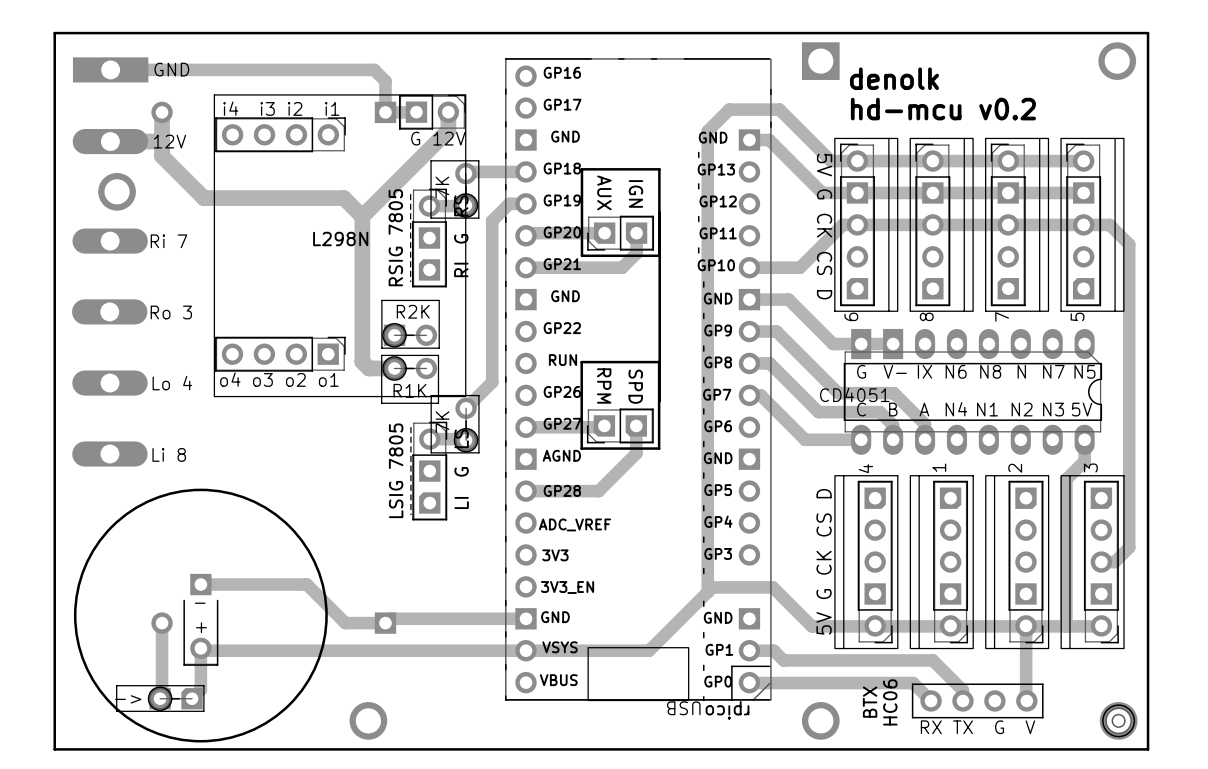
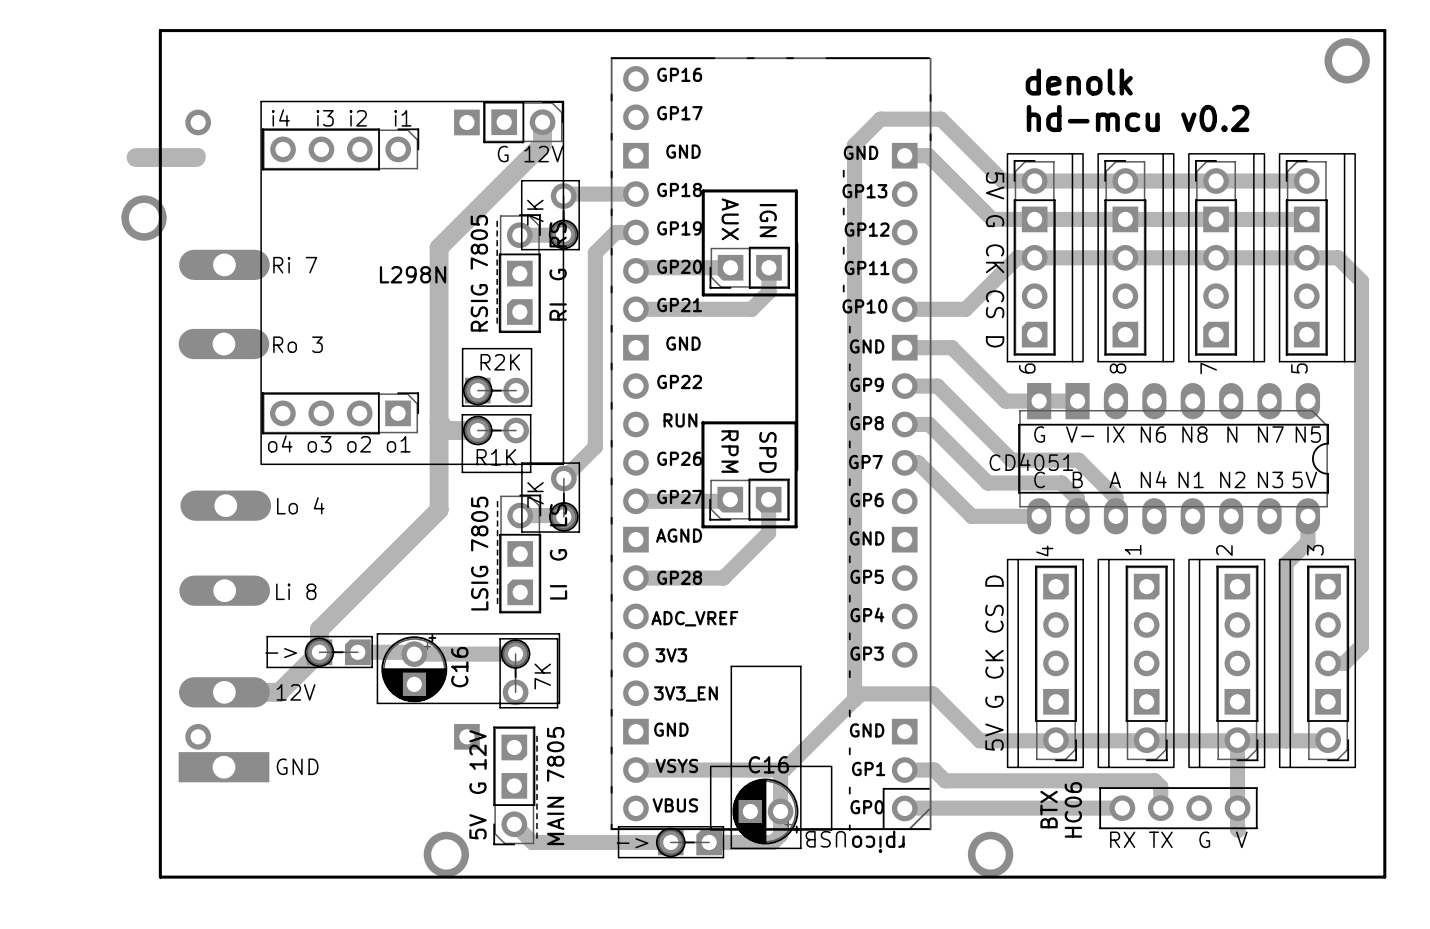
board edge: (54, 33) (1148, 33) (1148, 749) (54, 749) (54, 33) -> (160, 30) (160, 877) (1384, 877) (1384, 30) (160, 30)
part: (820, 61) -> none
track: (110, 69) (374, 69) (385, 81) (385, 112) (416, 112) (414, 112) -> none
part: (110, 69) -> none
text: GND (171, 69) -> none
track: (162, 112) (162, 156) (203, 198) (343, 198) (362, 216) -> none
part: (110, 141) -> none
text: 12V (169, 141) -> none
part: none -> (224, 264)
part: (110, 241) -> none
text position: Ri 7 (168, 241) -> Ri 7 (295, 265)
part: none -> (223, 344)
part: (109, 311) -> none
text position: Ro 3 (171, 312) -> Ro 3 (298, 344)
track: none -> (439, 422) (439, 509) (319, 629) (319, 652) (279, 692) (224, 692)
part: (109, 383) -> none
text position: Lo 4 (172, 383) -> Lo 4 (300, 505)
part: none -> (225, 505)
part: (109, 454) -> none
text position: Li 8 (169, 454) -> Li 8 (296, 591)
part: none -> (224, 590)
line: none -> (377, 633) (559, 633) (559, 703) (377, 703) (377, 633)
line: none -> (500, 638) (557, 638) (557, 707) (500, 707) (500, 638)
track: none -> (357, 652) (515, 654)
line: none -> (731, 666) (800, 666) (800, 848) (731, 848) (731, 666)
part: none -> C16 (414, 668)
7K: none -> (515, 672)
track: (200, 584) (306, 584) (345, 623) (385, 623) (389, 618) (526, 618) -> none
part: none -> (224, 692)
text: none -> 12V (296, 692)
part: (200, 615) -> none
track: (162, 623) (162, 696) (160, 698) -> none
part: none -> (223, 767)
text: none -> GND (297, 766)
track: (526, 650) (203, 650) (200, 648) (200, 689) (192, 698) -> none
track: (773, 650) (783, 660) (932, 660) (962, 690) (962, 700) -> (934, 770) (945, 780) (1154, 780) (1160, 786) (1160, 808)
track: none -> (780, 773) (780, 835) (773, 842) (709, 842)
MAIN 7805: none -> (515, 785)
track: (749, 682) (913, 683) (931, 700) -> (904, 808) (1122, 808)
line: (116, 685) (203, 685) (203, 711) (116, 711) (116, 685) -> (267, 636) (372, 636) (372, 667) (267, 667) (267, 636)
part: none -> C16 (766, 811)
track: none -> (514, 824) (532, 842) (670, 842)
line: none -> (618, 826) (723, 826) (723, 857) (618, 857) (618, 826)
part position: (175, 698) -> (337, 652)
part position: (977, 700) -> (1178, 808)
text position: BTX (870, 702) -> BTX (1049, 809)
text position: HC06 (890, 702) -> HC06 (1073, 809)
part: none -> (688, 842)
part: (1118, 720) -> none

